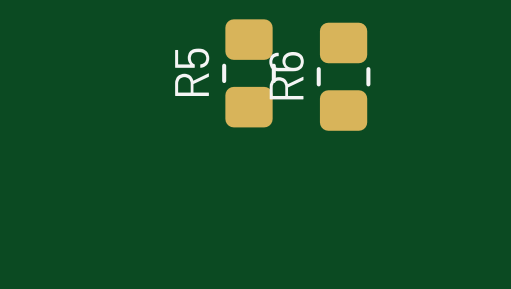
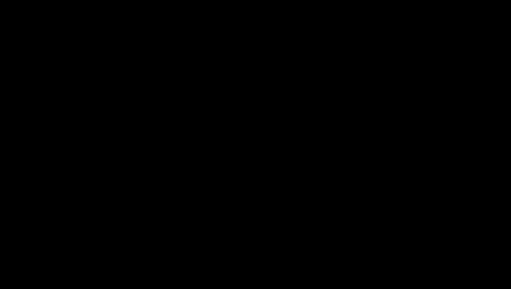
R5: (249, 73) -> none
R6: (343, 76) -> none

